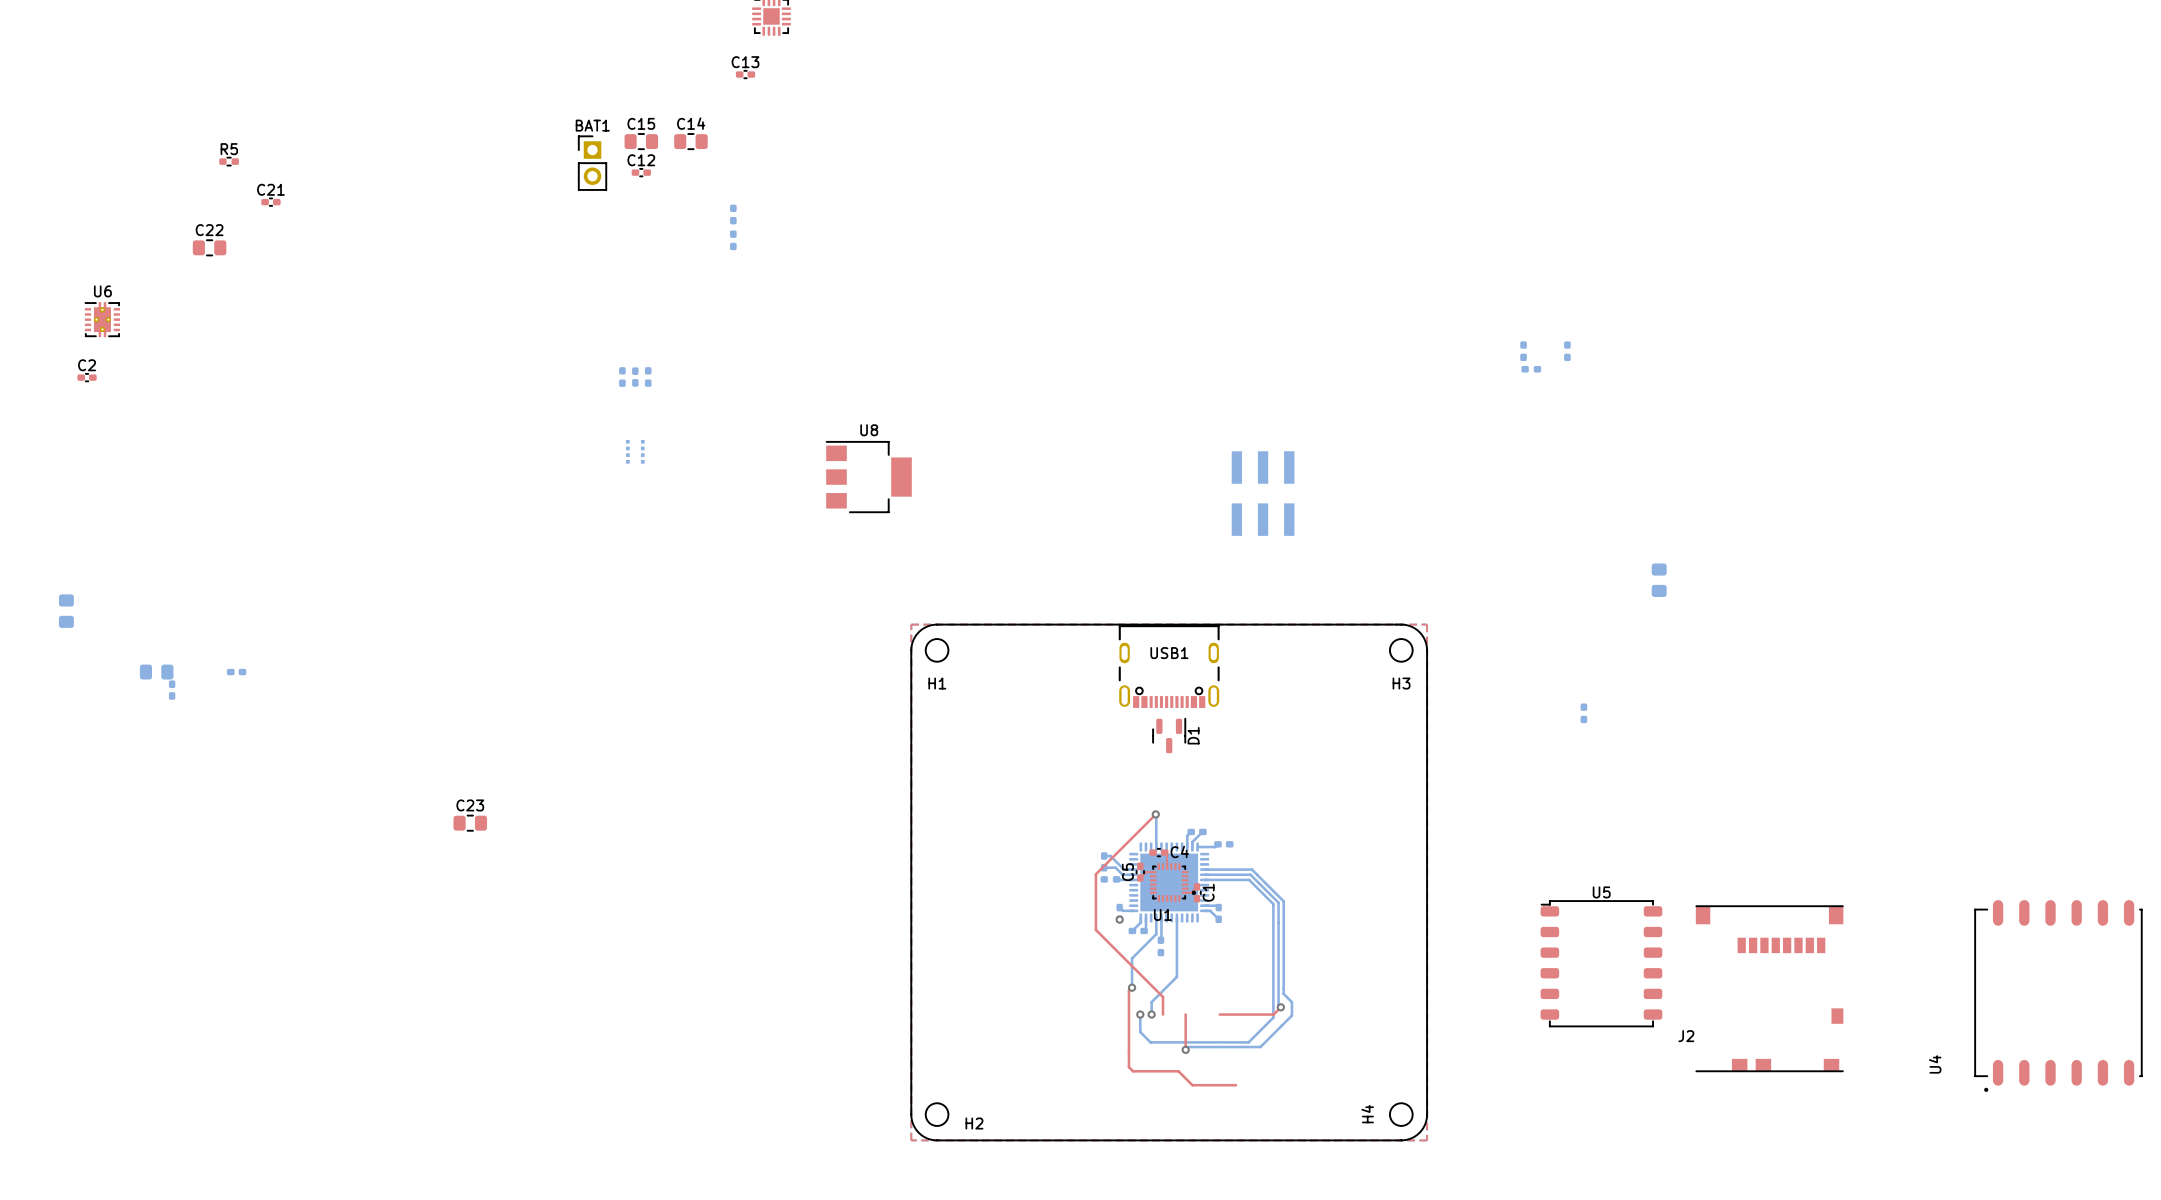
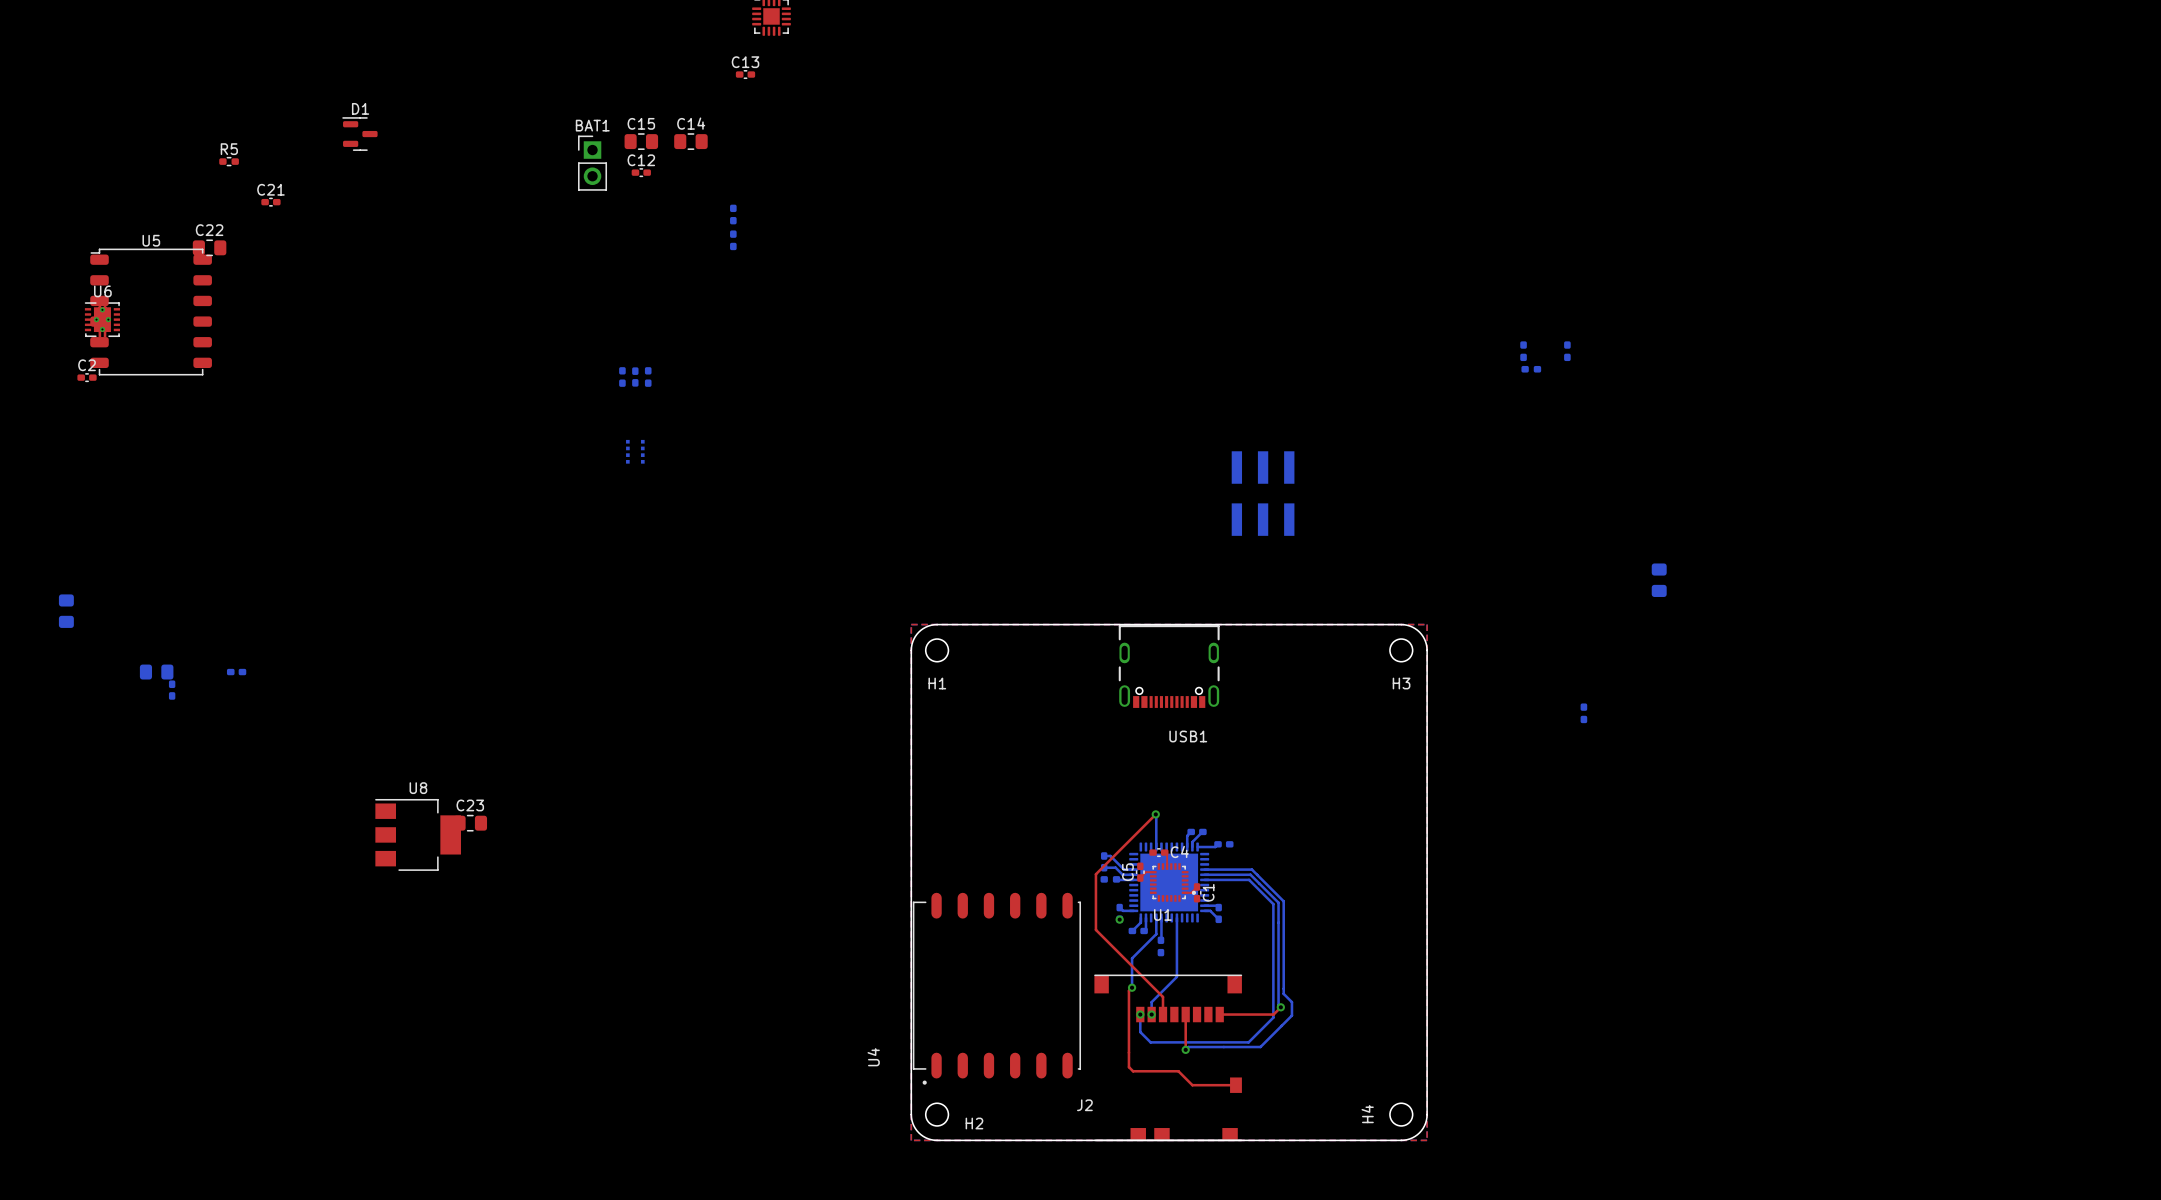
U8 position: (868, 477) -> (418, 834)
USB1 name position: USB1 (1169, 653) -> USB1 (1188, 736)
D1 rotation: 0° (1169, 735) -> 90° counterclockwise (359, 134)
D1 position: (1169, 735) -> (359, 134)
U5 position: (1601, 963) -> (151, 312)
J2 position: (1769, 988) -> (1168, 1057)
U4 position: (2058, 995) -> (996, 988)

